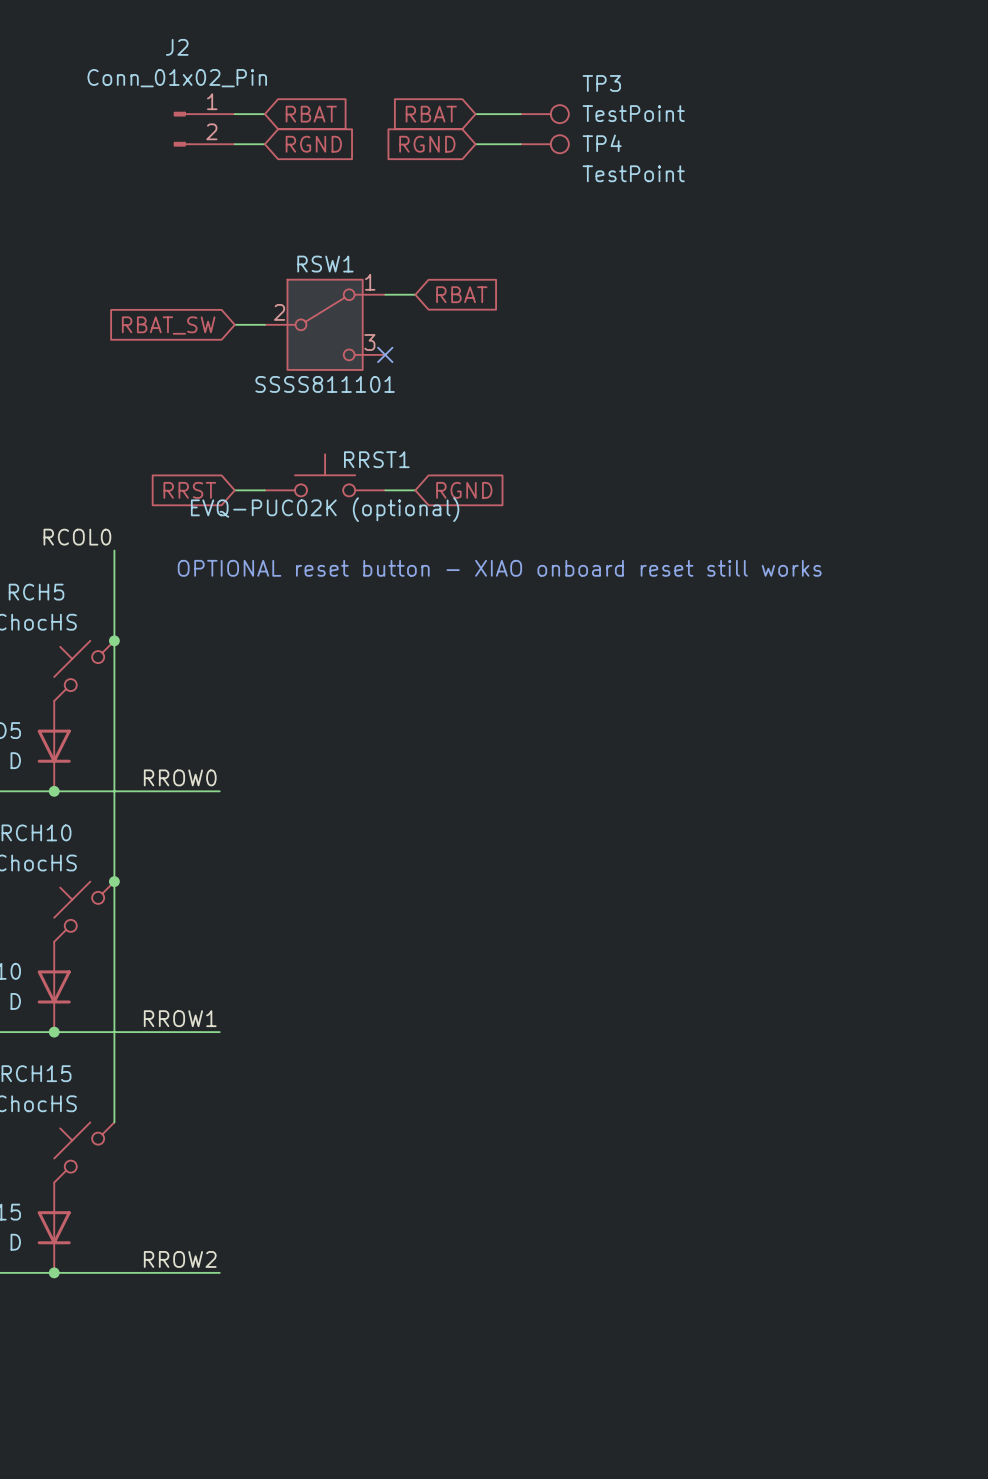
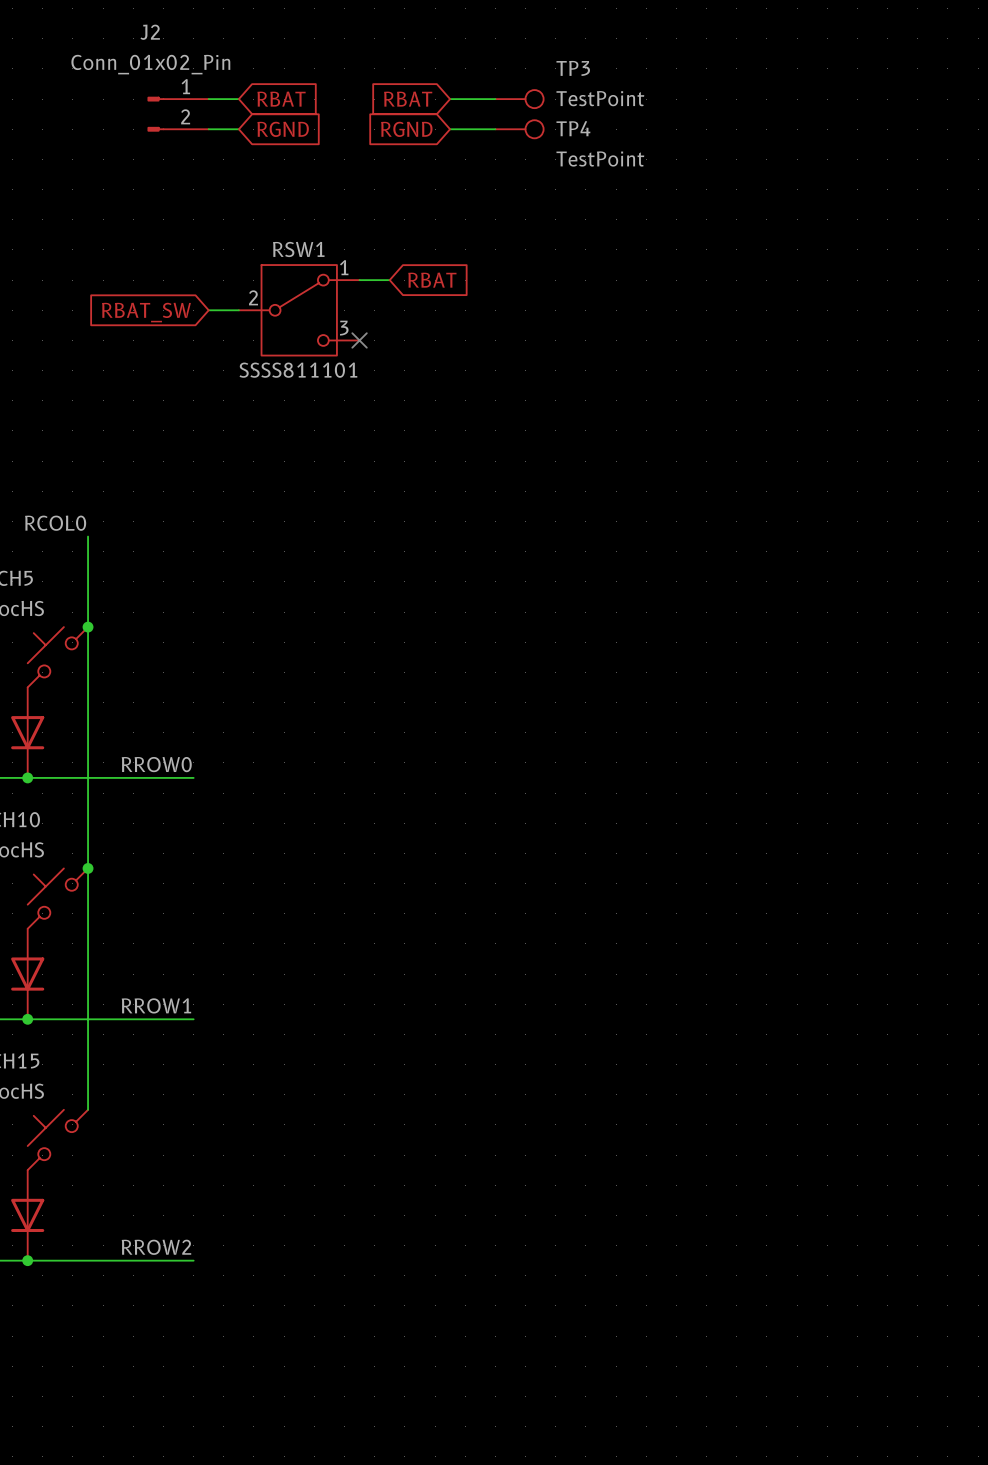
RRST1: EVQ-PUC02K (optional) (325, 475) -> none
global label: RRST (189, 490) -> none
wire: (234, 490) (264, 490) -> none
wire: (385, 490) (415, 490) -> none
global label: RGND (464, 490) -> none
text: OPTIONAL reset button - XIAO onboard reset still works (499, 568) -> none

